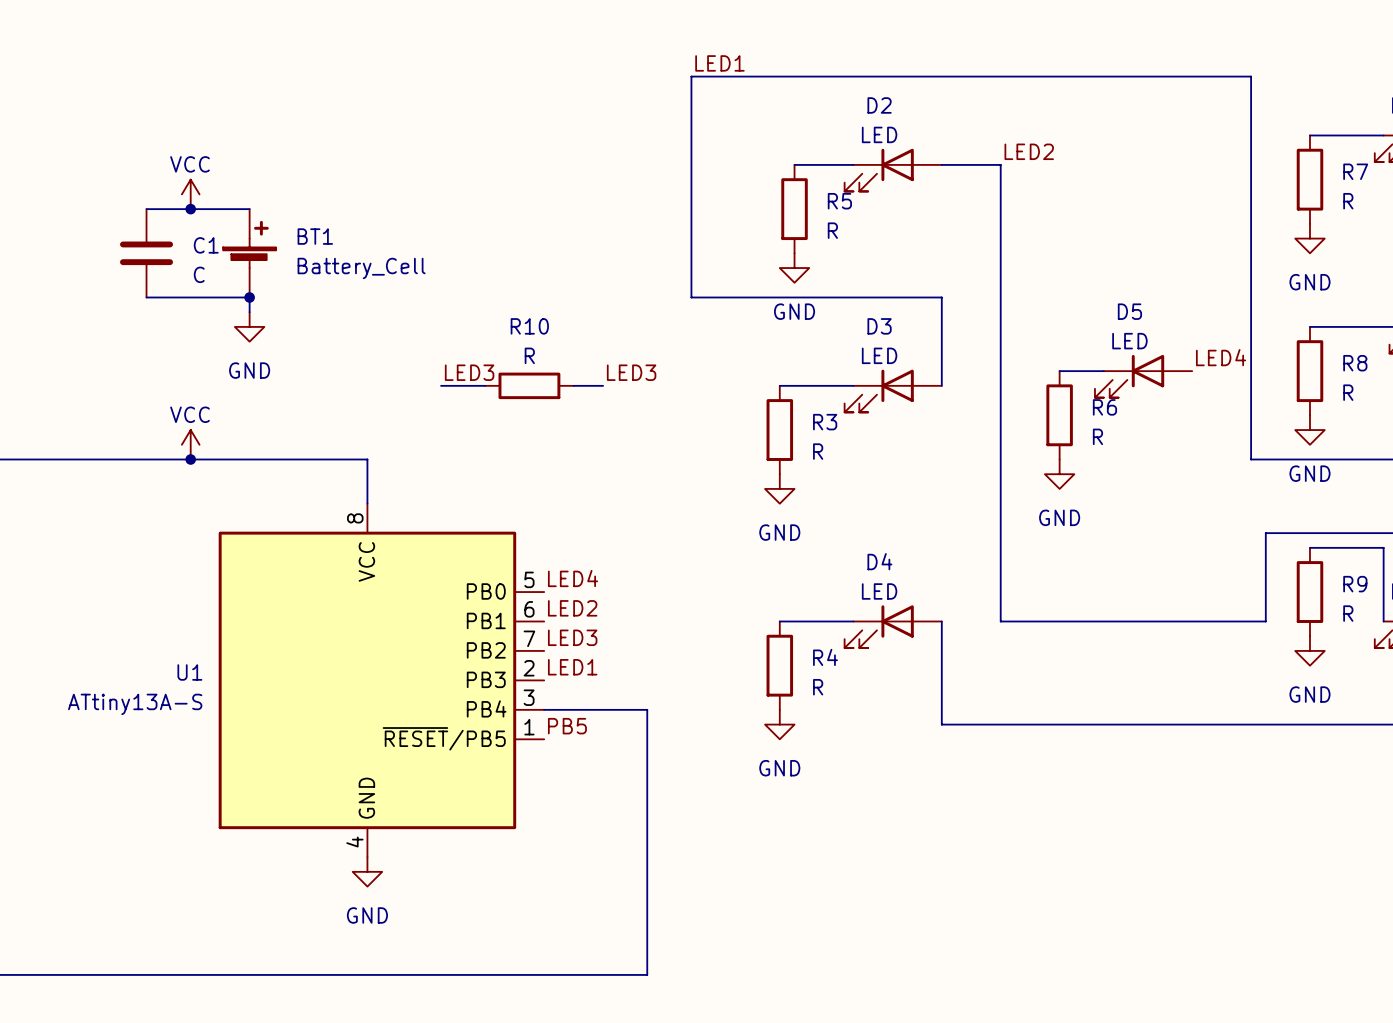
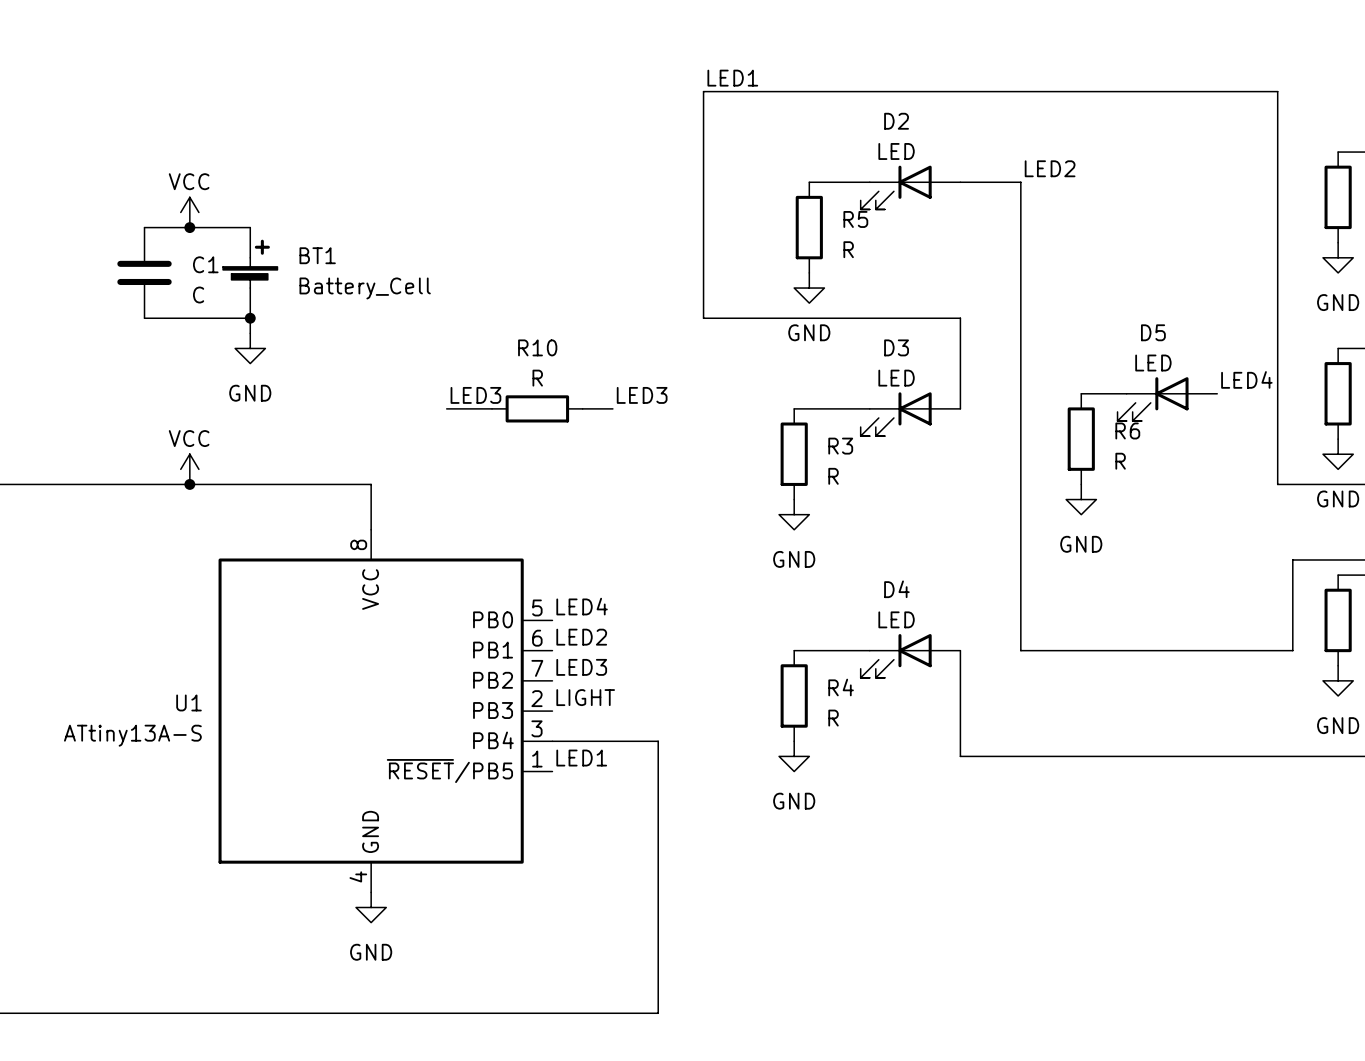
label: LED1 (572, 667) -> LIGHT (585, 697)
label: PB5 (567, 726) -> LED1 (581, 758)

